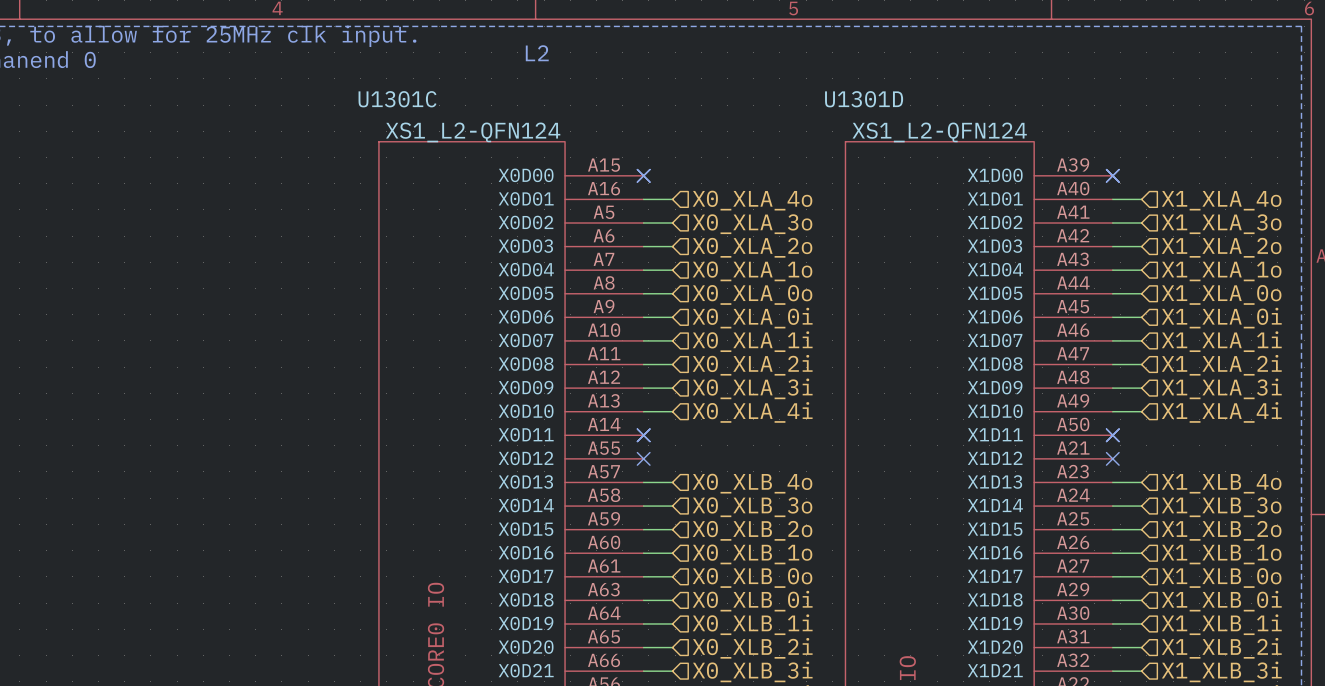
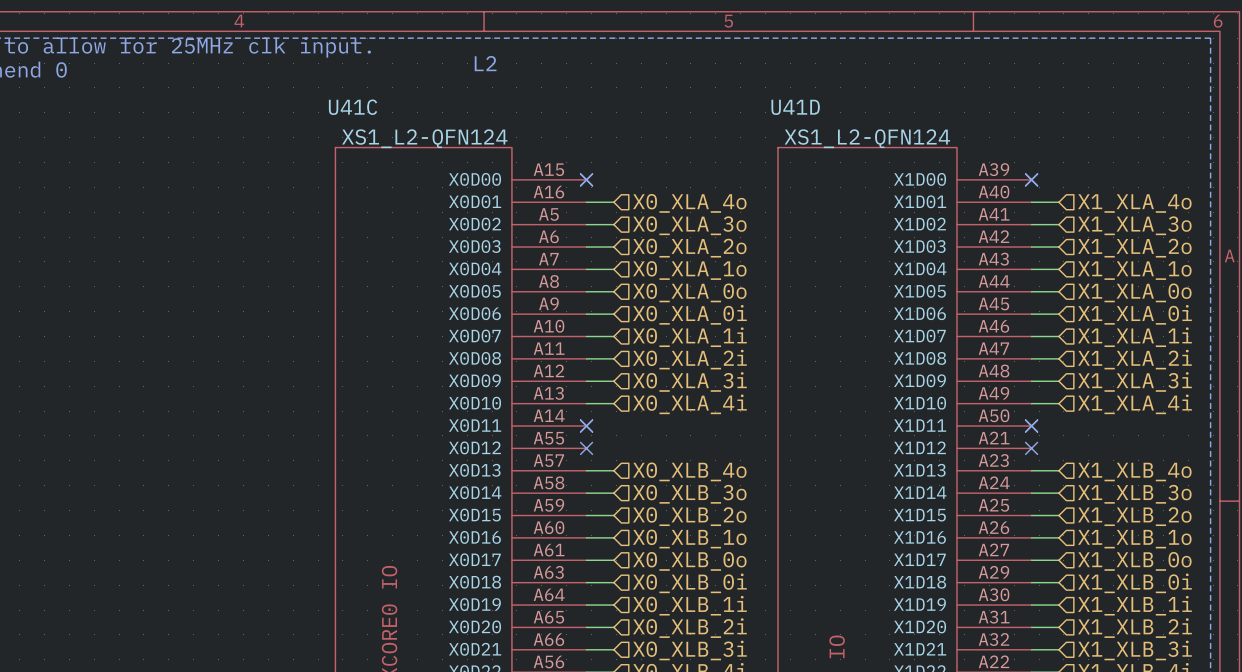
U1301C name: U1301C (397, 99) -> U41C (353, 107)
U1301D name: U1301D (864, 99) -> U41D (795, 107)

